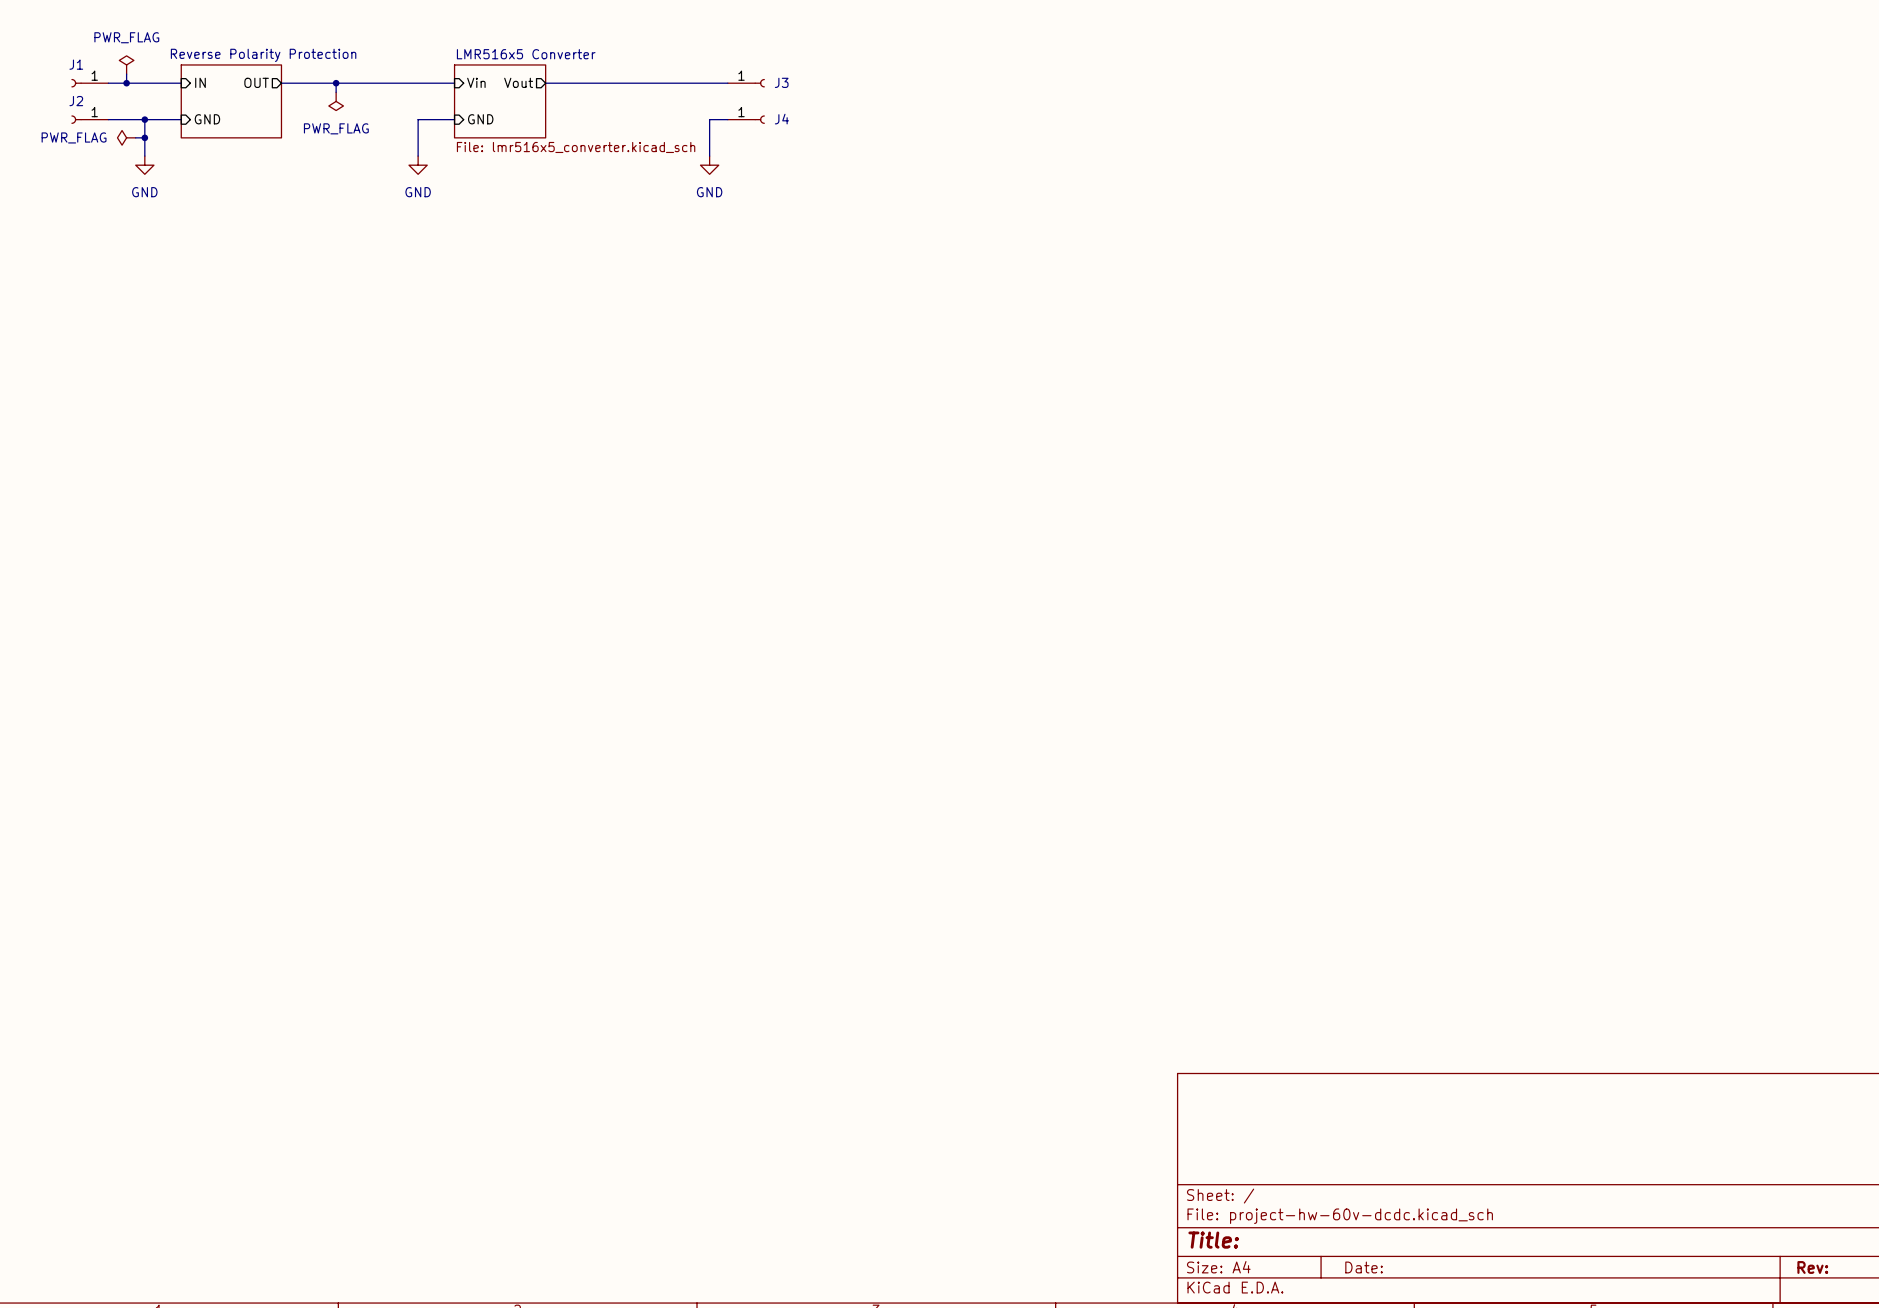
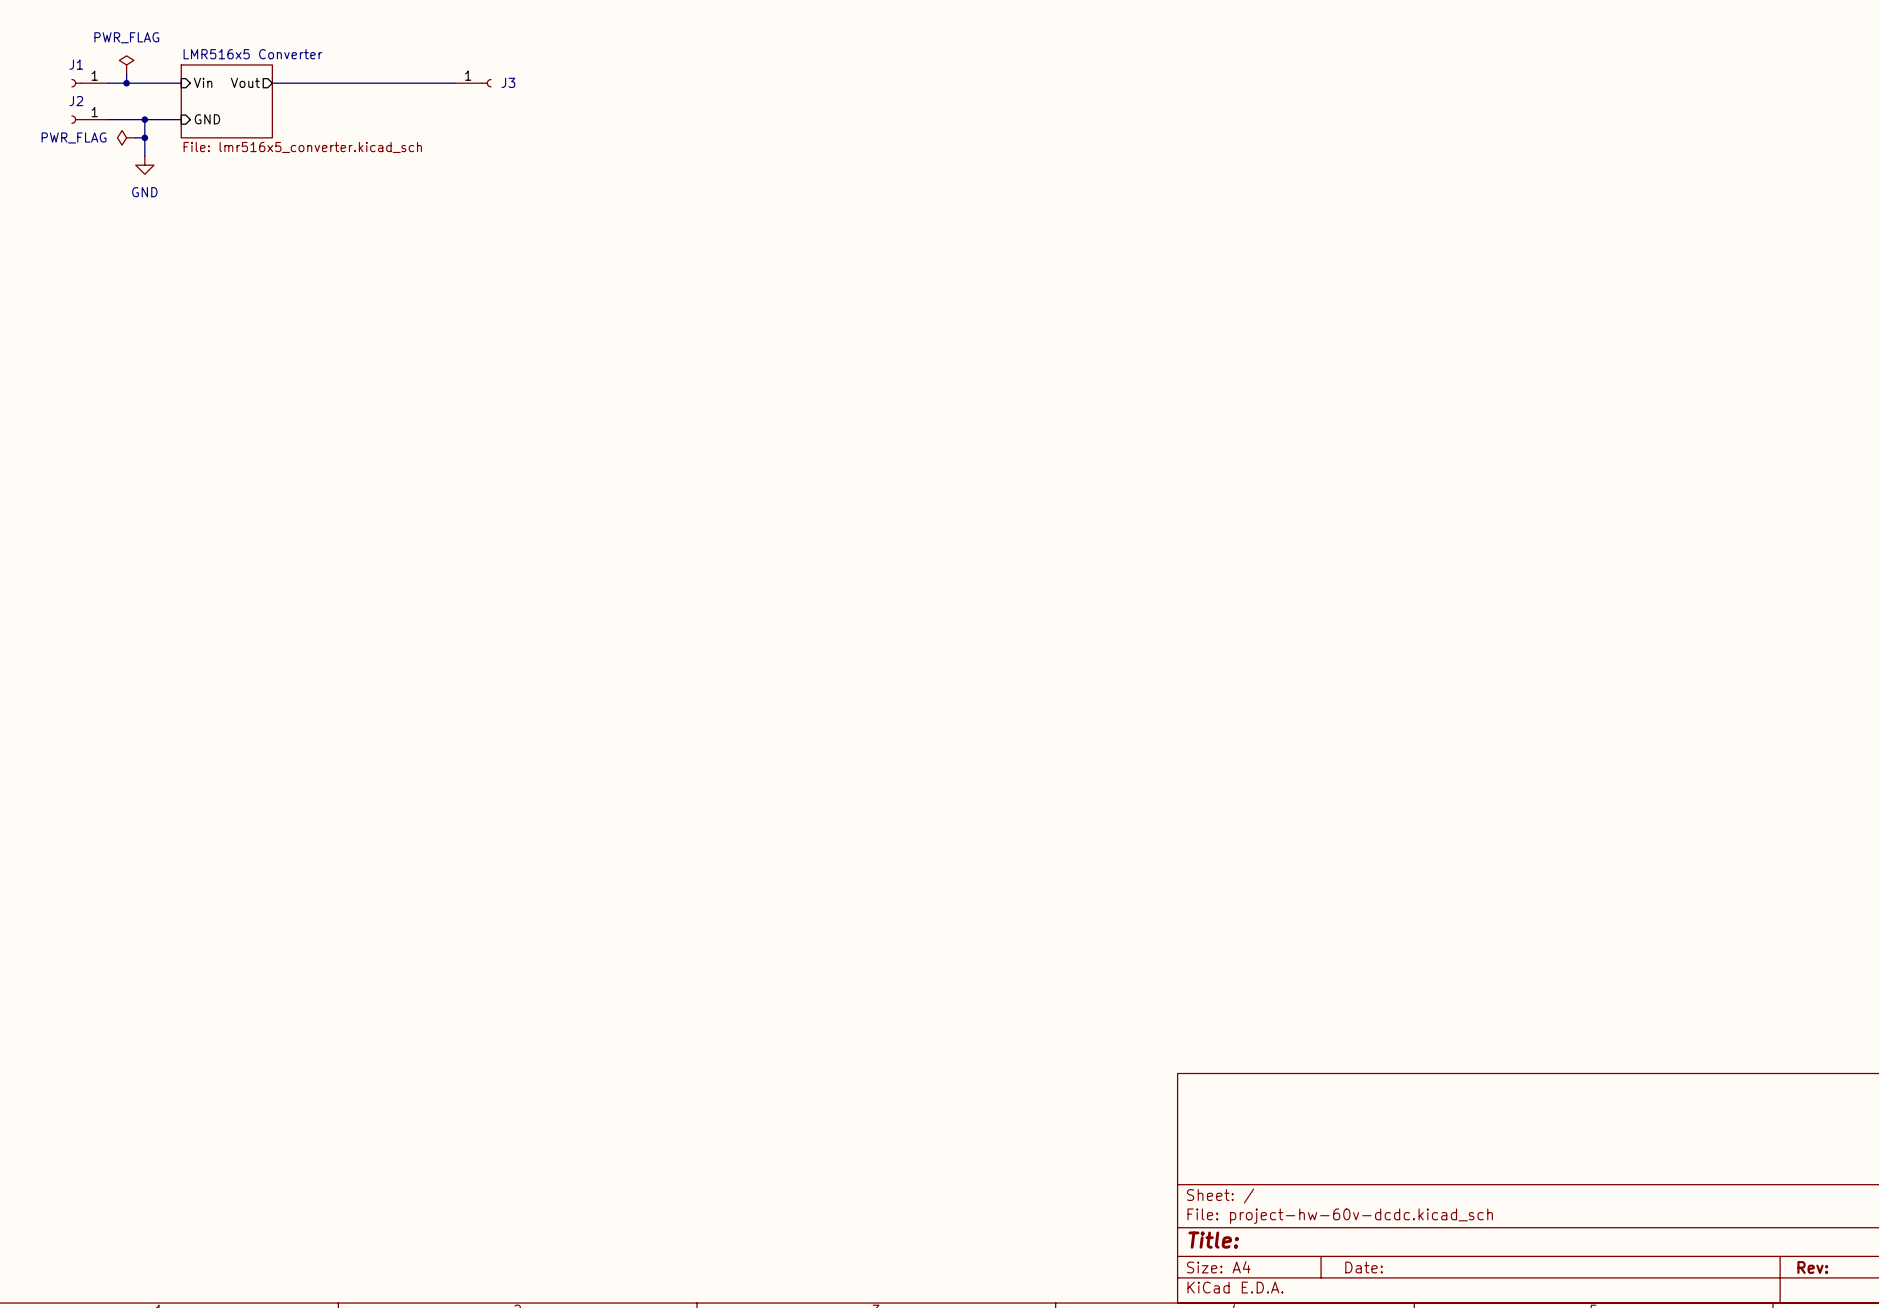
sheet pin: IN (200, 82) -> Vin (203, 82)
sheet pin: none -> Vout (245, 82)
sheet pin: OUT (256, 82) -> none
sheet pin: Vin (476, 82) -> none
sheet pin: Vout (518, 82) -> none
wire: none -> (272, 83) (281, 83)
wire: (336, 83) (336, 92) -> none
junction: (336, 83) -> none
wire: (545, 83) (727, 83) -> none
J3 position: (746, 83) -> (473, 83)
sheet Reverse Polarity Protection: (231, 101) -> none
power symbol: PWR_FLAG (336, 101) -> none
sheet LMR516x5 Converter position: (500, 101) -> (226, 101)
wire: (454, 119) (418, 119) (418, 156) -> none
sheet pin: GND (480, 119) -> none
wire: (727, 119) (709, 119) (709, 156) -> none
J4: (746, 119) -> none
power symbol: GND (418, 165) -> none
power symbol: GND (709, 165) -> none

